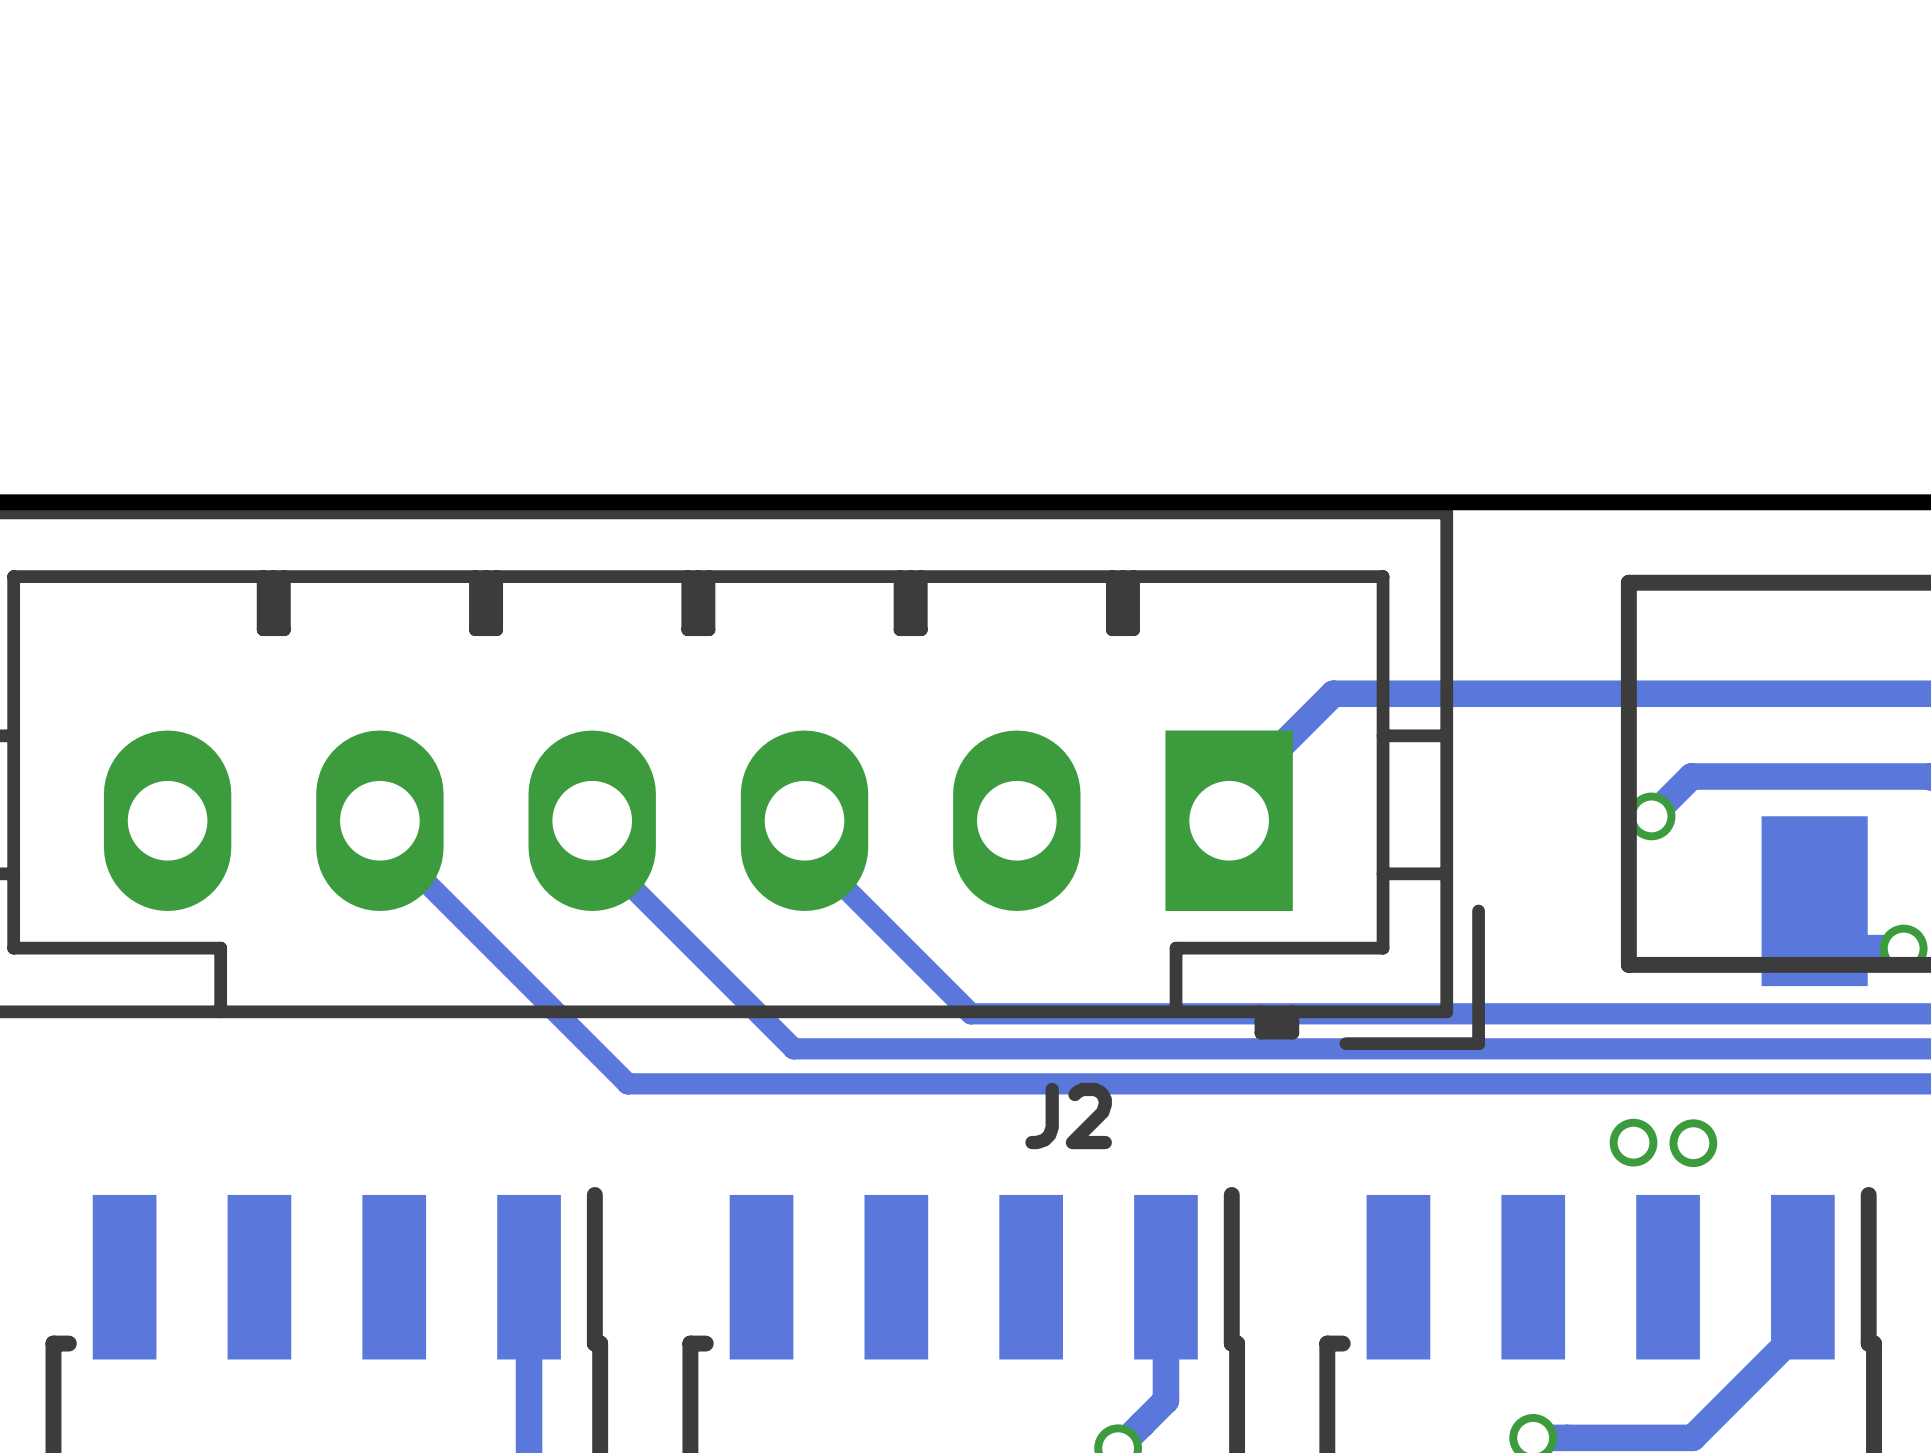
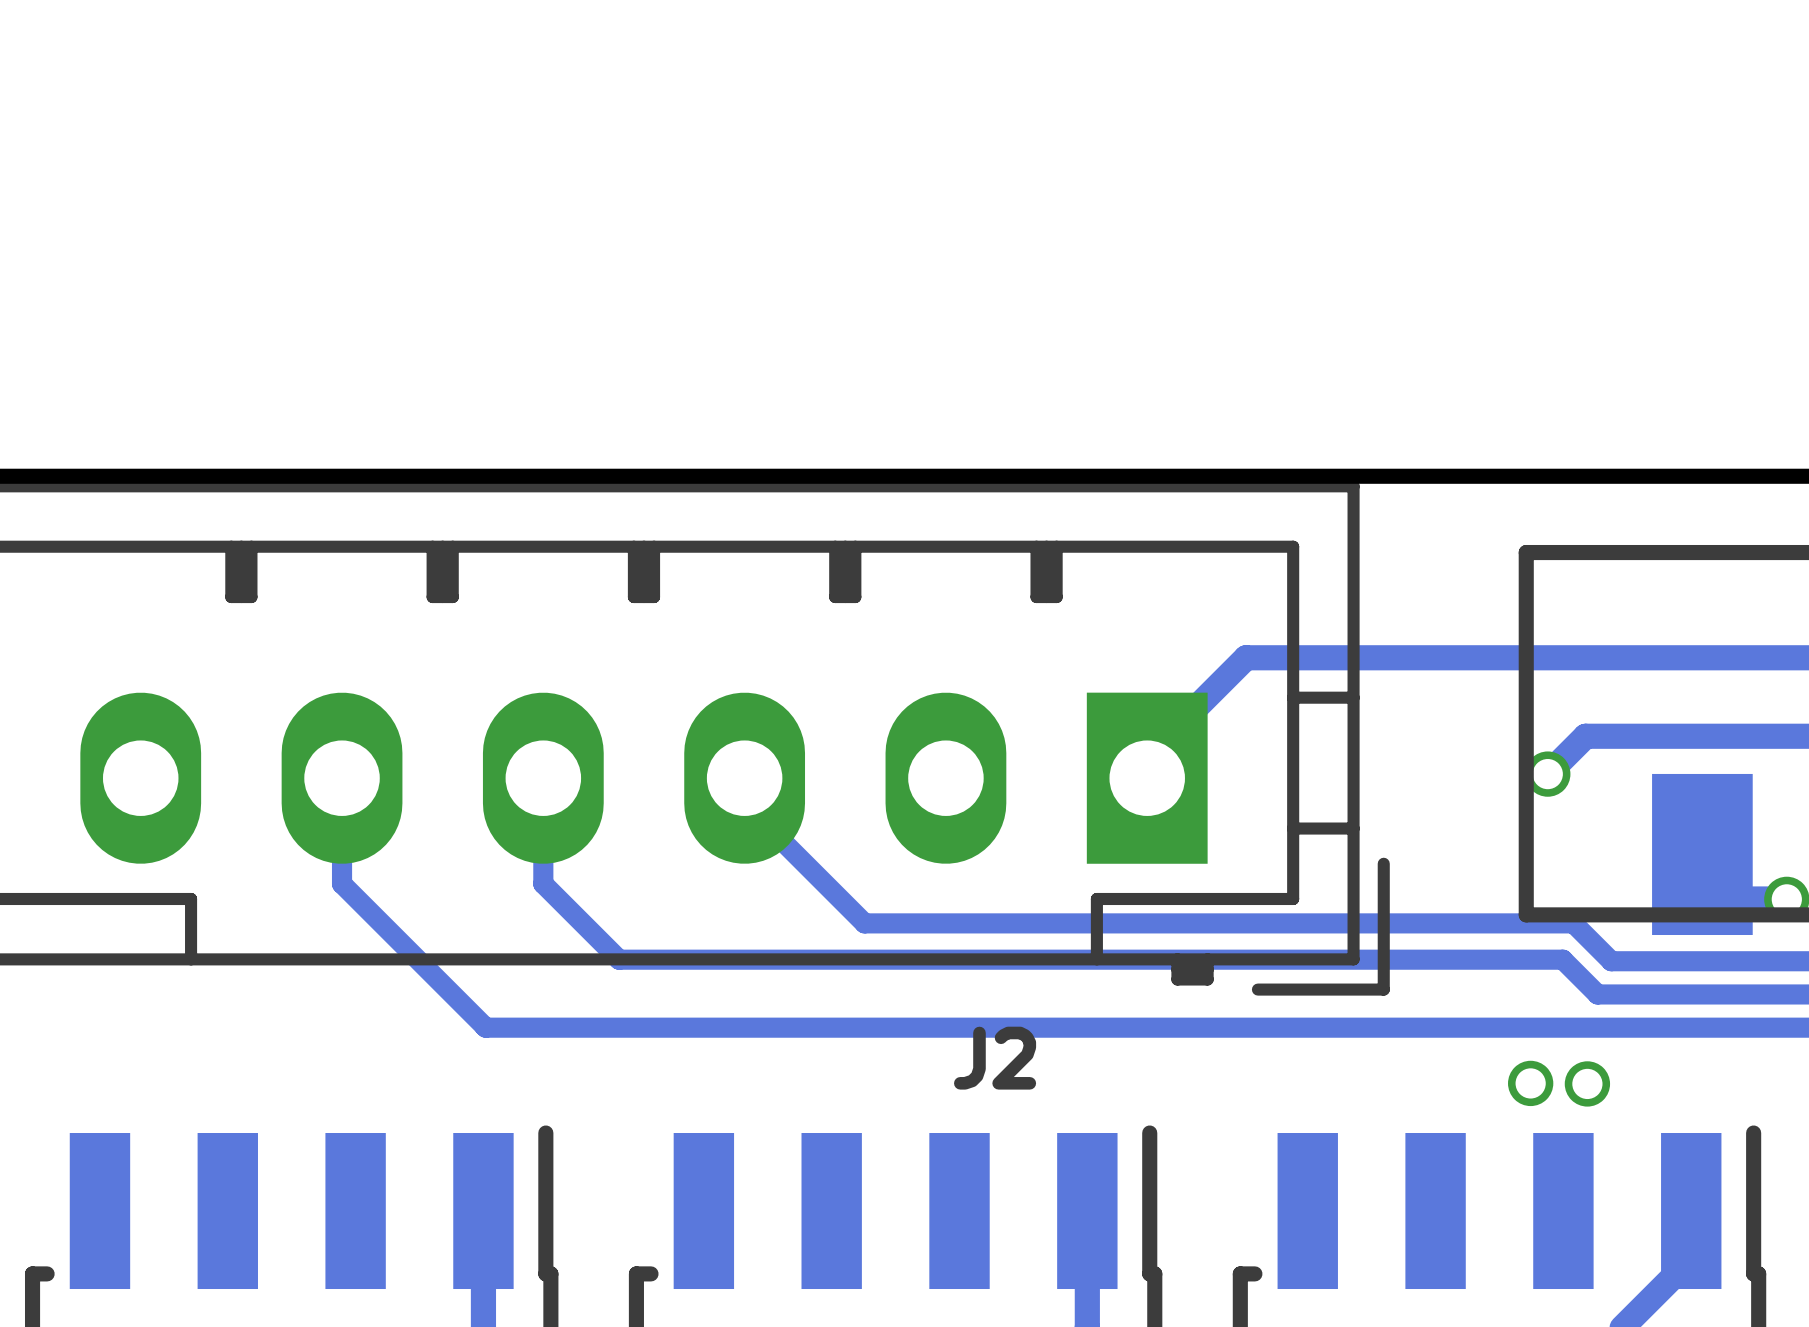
track: (379, 835) (627, 1083) -> (342, 792) (342, 883) (485, 1027) (577, 1027)
track: (592, 847) (793, 1048) (1704, 1048) -> (543, 803) (543, 883) (619, 959) (1562, 959) (1597, 994)
track: (931, 973) (971, 1013) (1718, 1013) -> (864, 923) (1573, 923) (1611, 961)

